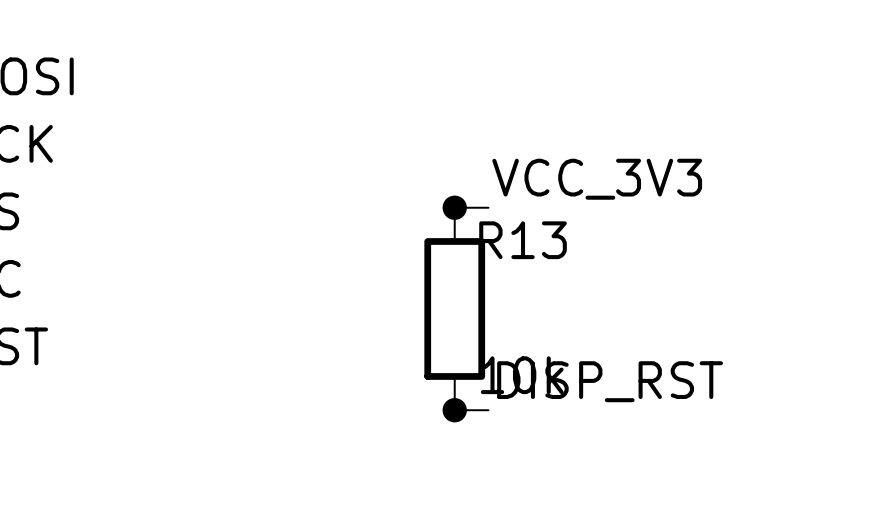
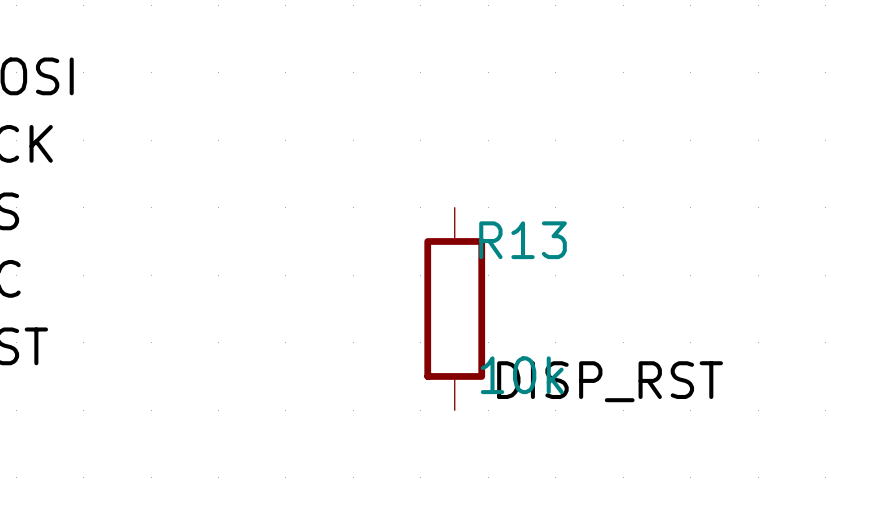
label: VCC_3V3 (597, 179) -> none
wire: (454, 207) (488, 207) -> none
junction: (454, 207) -> none
wire: (454, 410) (488, 410) -> none
junction: (454, 410) -> none

